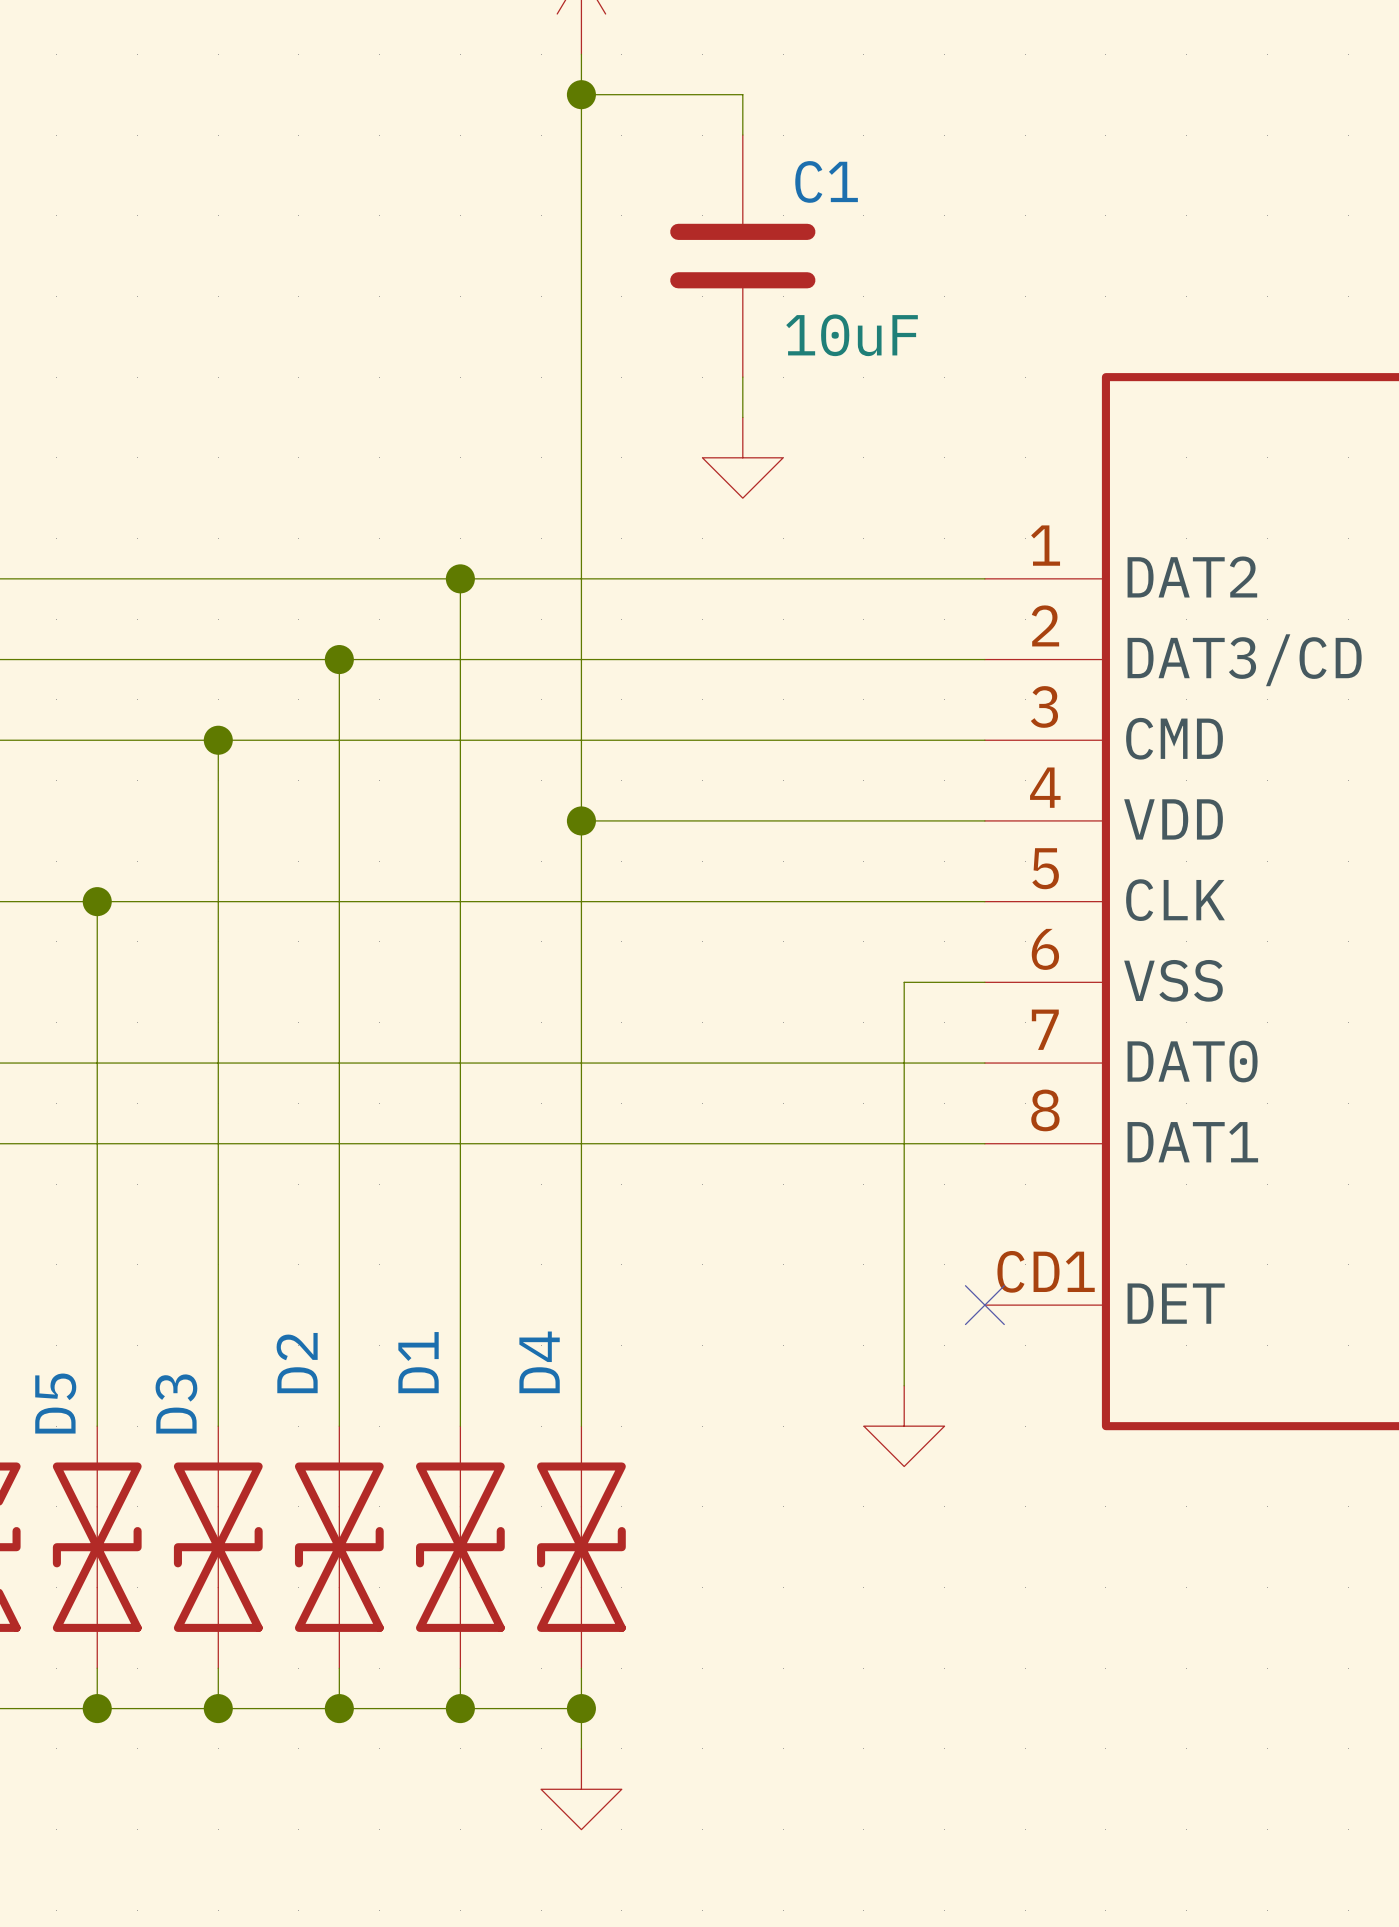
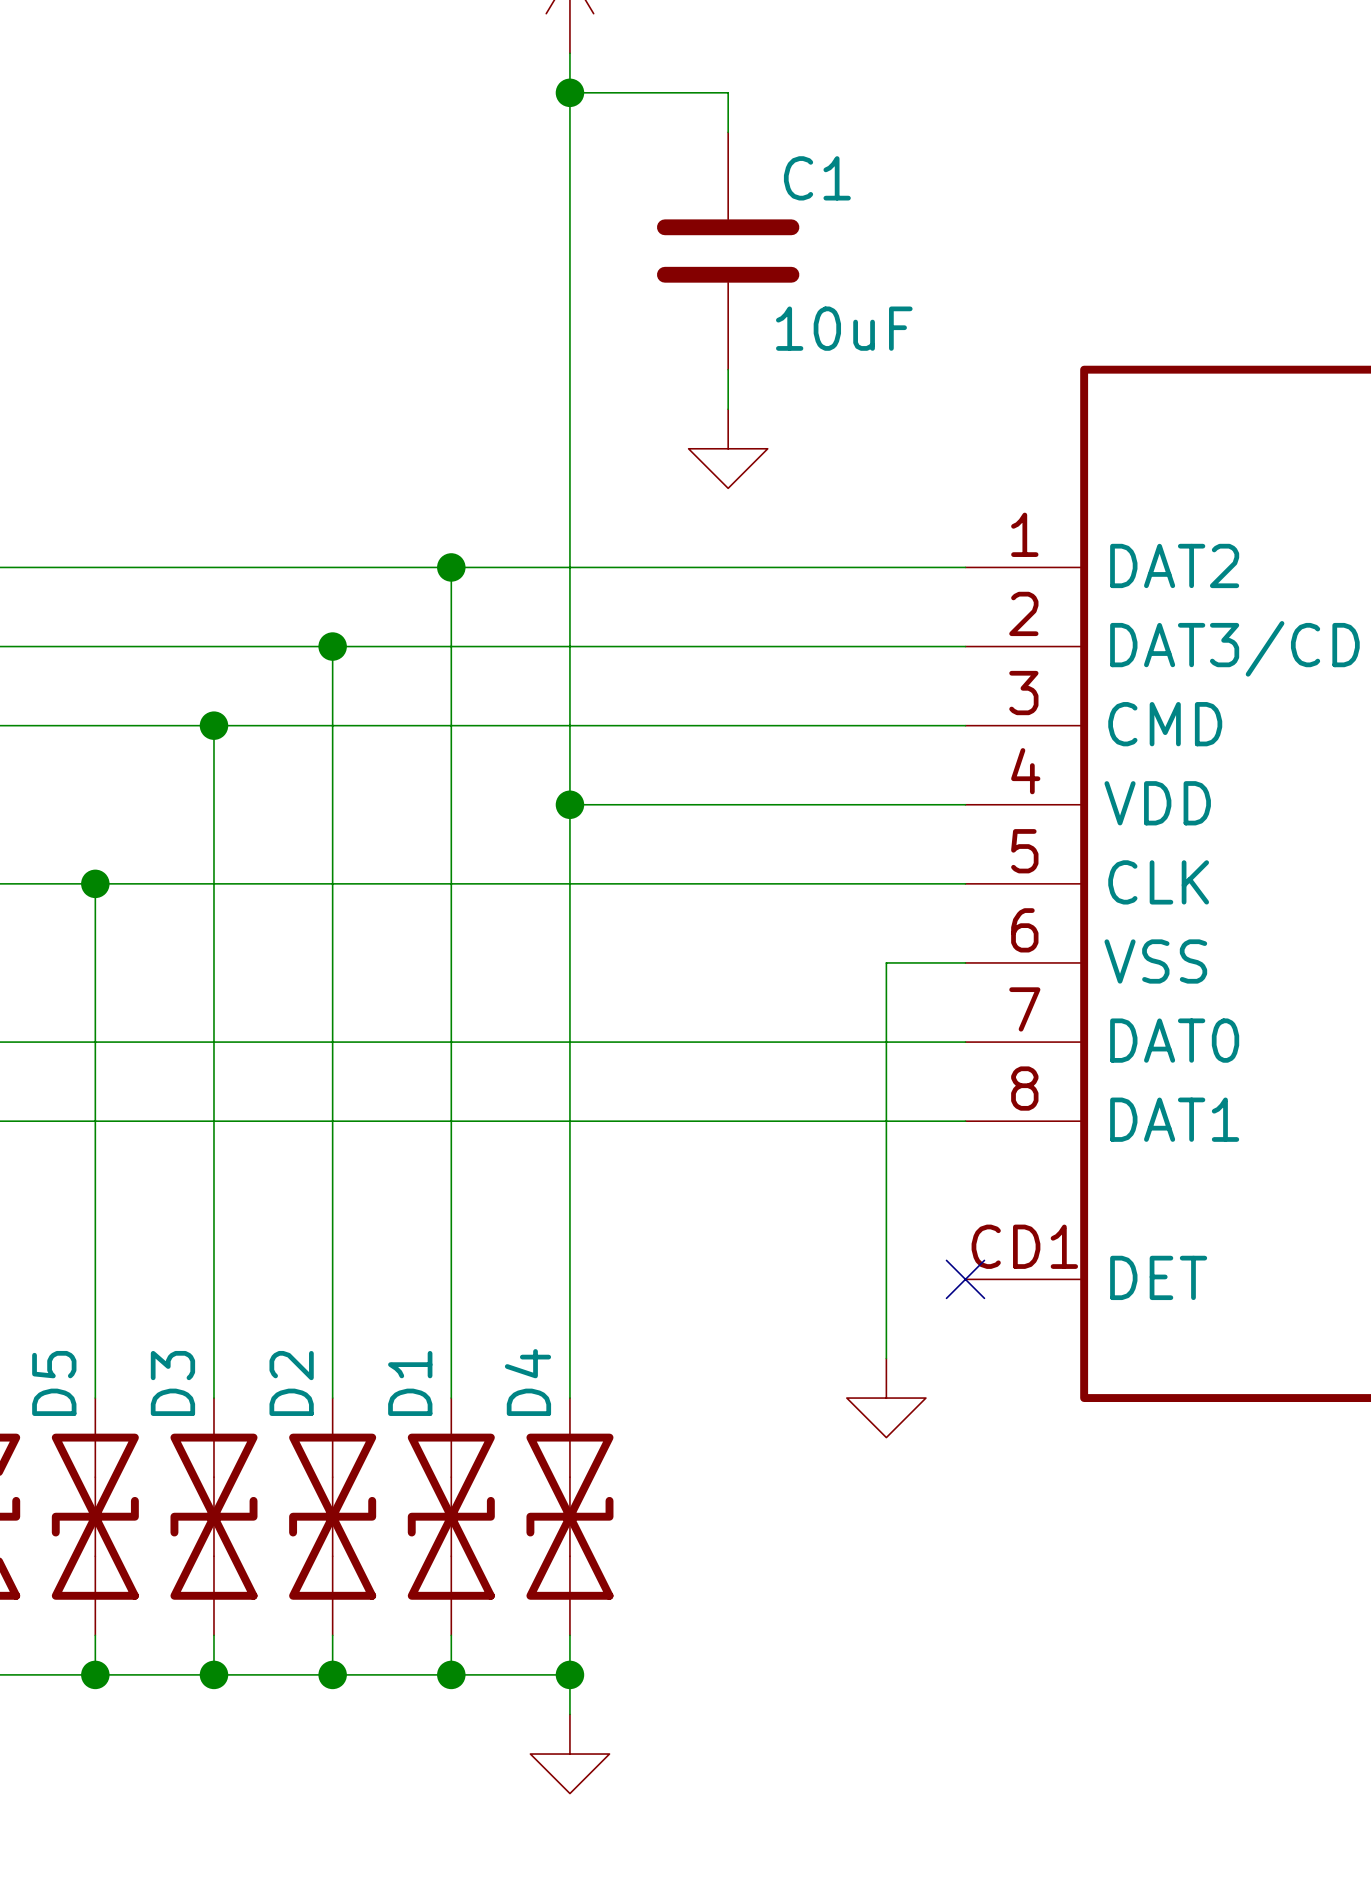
D1 name position: D1 (418, 1362) -> D1 (410, 1383)
D4 name position: D4 (539, 1362) -> D4 (527, 1382)
D2 name position: D2 (297, 1363) -> D2 (291, 1383)

